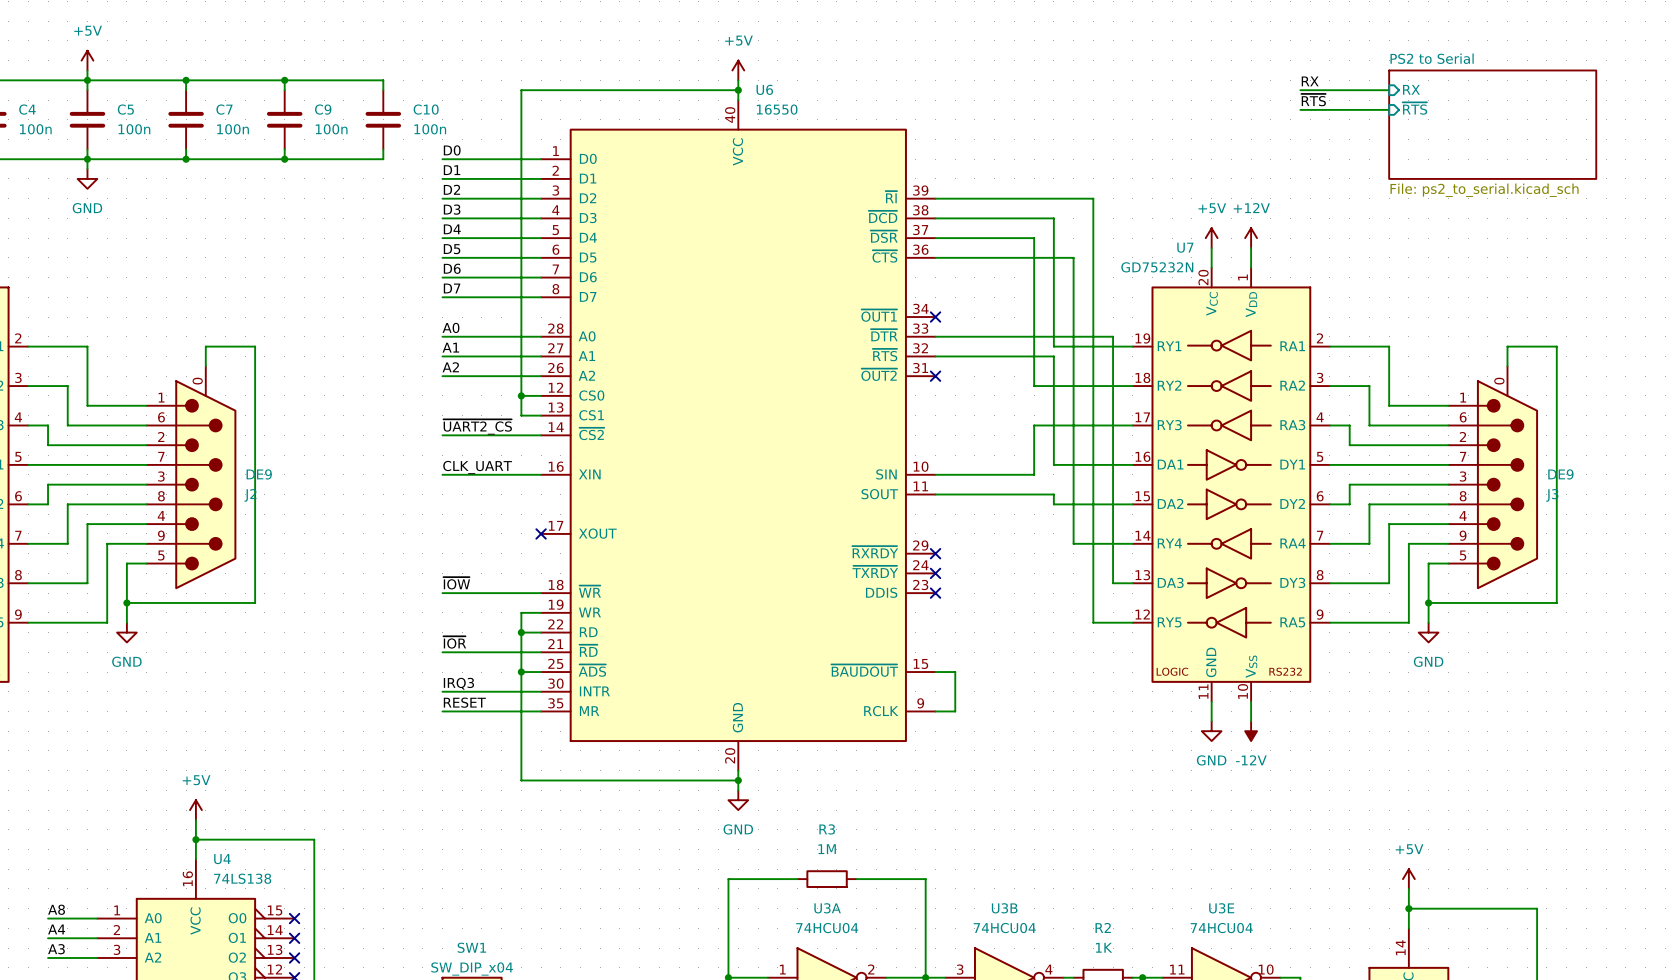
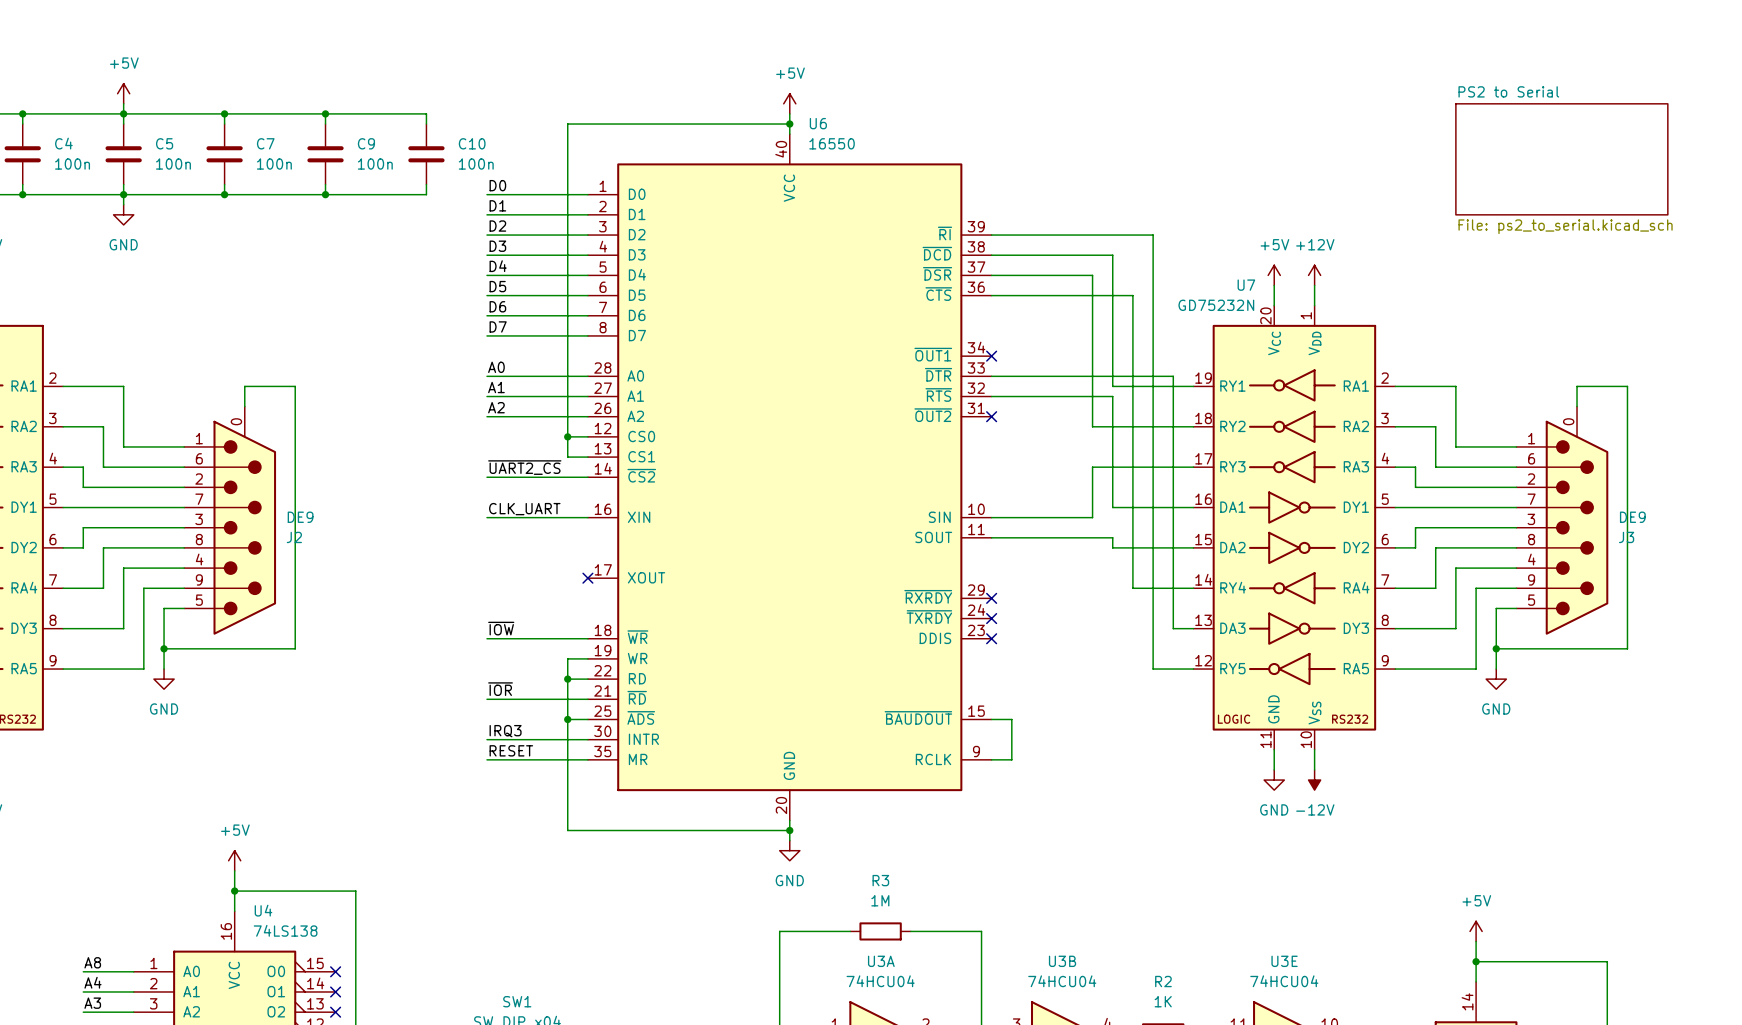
label: RX (1310, 81) -> none
sheet pin: RX (1411, 89) -> none
wire: (1300, 90) (1389, 90) -> none
label: ~{RTS} (1313, 100) -> none
sheet pin: ~{RTS} (1414, 108) -> none
wire: (1300, 109) (1389, 109) -> none

